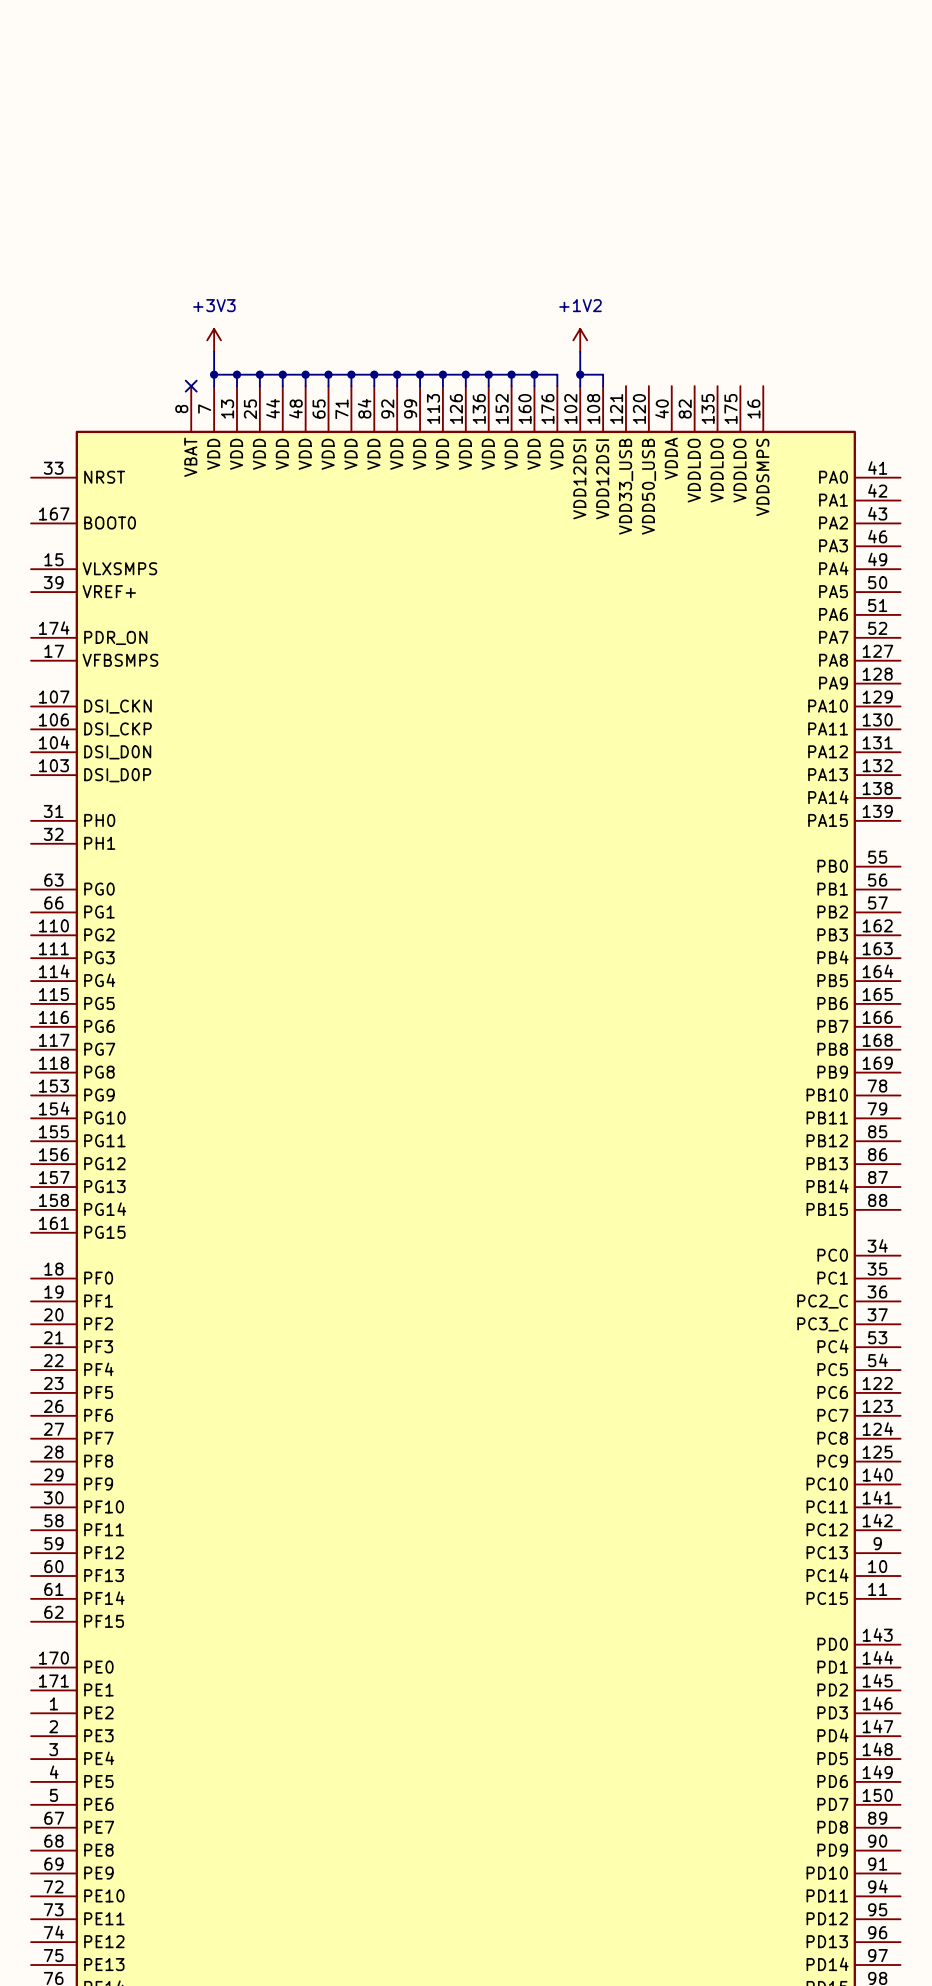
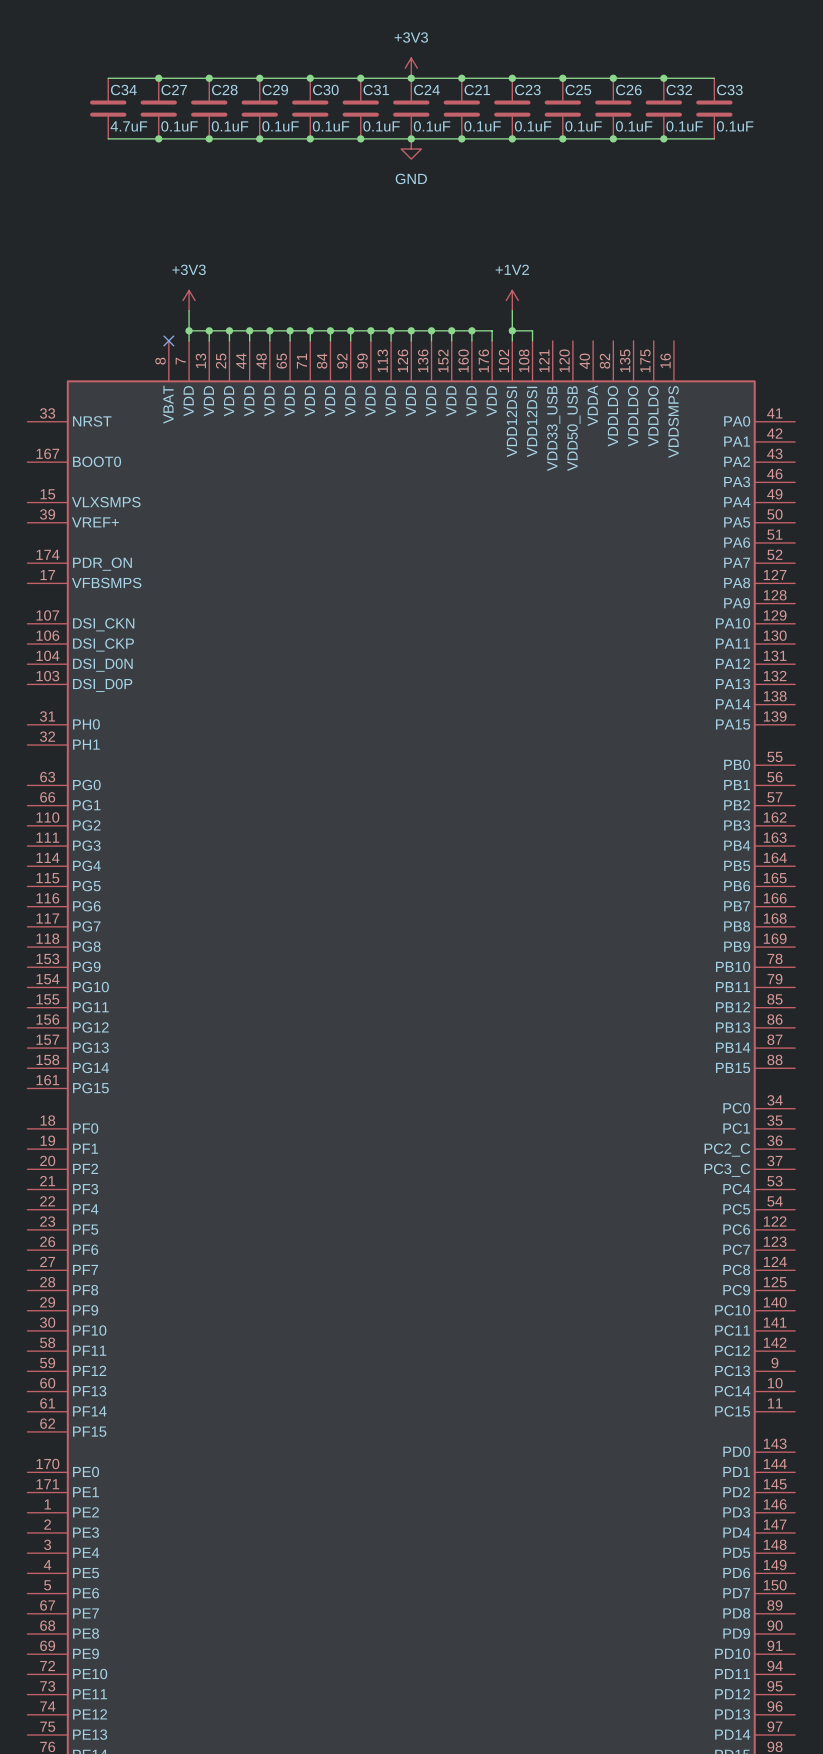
power symbol: none -> +3V3 (411, 68)
wire: none -> (108, 78) (714, 78)
junction: none -> (158, 78)
junction: none -> (209, 78)
junction: none -> (259, 78)
junction: none -> (310, 78)
junction: none -> (360, 78)
junction: none -> (411, 78)
junction: none -> (461, 78)
junction: none -> (512, 78)
junction: none -> (562, 78)
junction: none -> (613, 78)
junction: none -> (663, 78)
C34: none -> 4.7uF (108, 108)
C27: none -> 0.1uF (158, 108)
C28: none -> 0.1uF (209, 108)
C29: none -> 0.1uF (259, 108)
C30: none -> 0.1uF (310, 108)
C31: none -> 0.1uF (360, 108)
C24: none -> 0.1uF (411, 108)
C21: none -> 0.1uF (461, 108)
C23: none -> 0.1uF (512, 108)
C25: none -> 0.1uF (562, 108)
C26: none -> 0.1uF (613, 108)
C32: none -> 0.1uF (663, 108)
C33: none -> 0.1uF (714, 108)
wire: none -> (108, 138) (714, 138)
junction: none -> (158, 138)
junction: none -> (209, 138)
junction: none -> (259, 138)
junction: none -> (310, 138)
junction: none -> (360, 138)
junction: none -> (411, 138)
junction: none -> (461, 138)
junction: none -> (512, 138)
junction: none -> (562, 138)
junction: none -> (613, 138)
junction: none -> (663, 138)
power symbol: none -> GND (411, 149)

